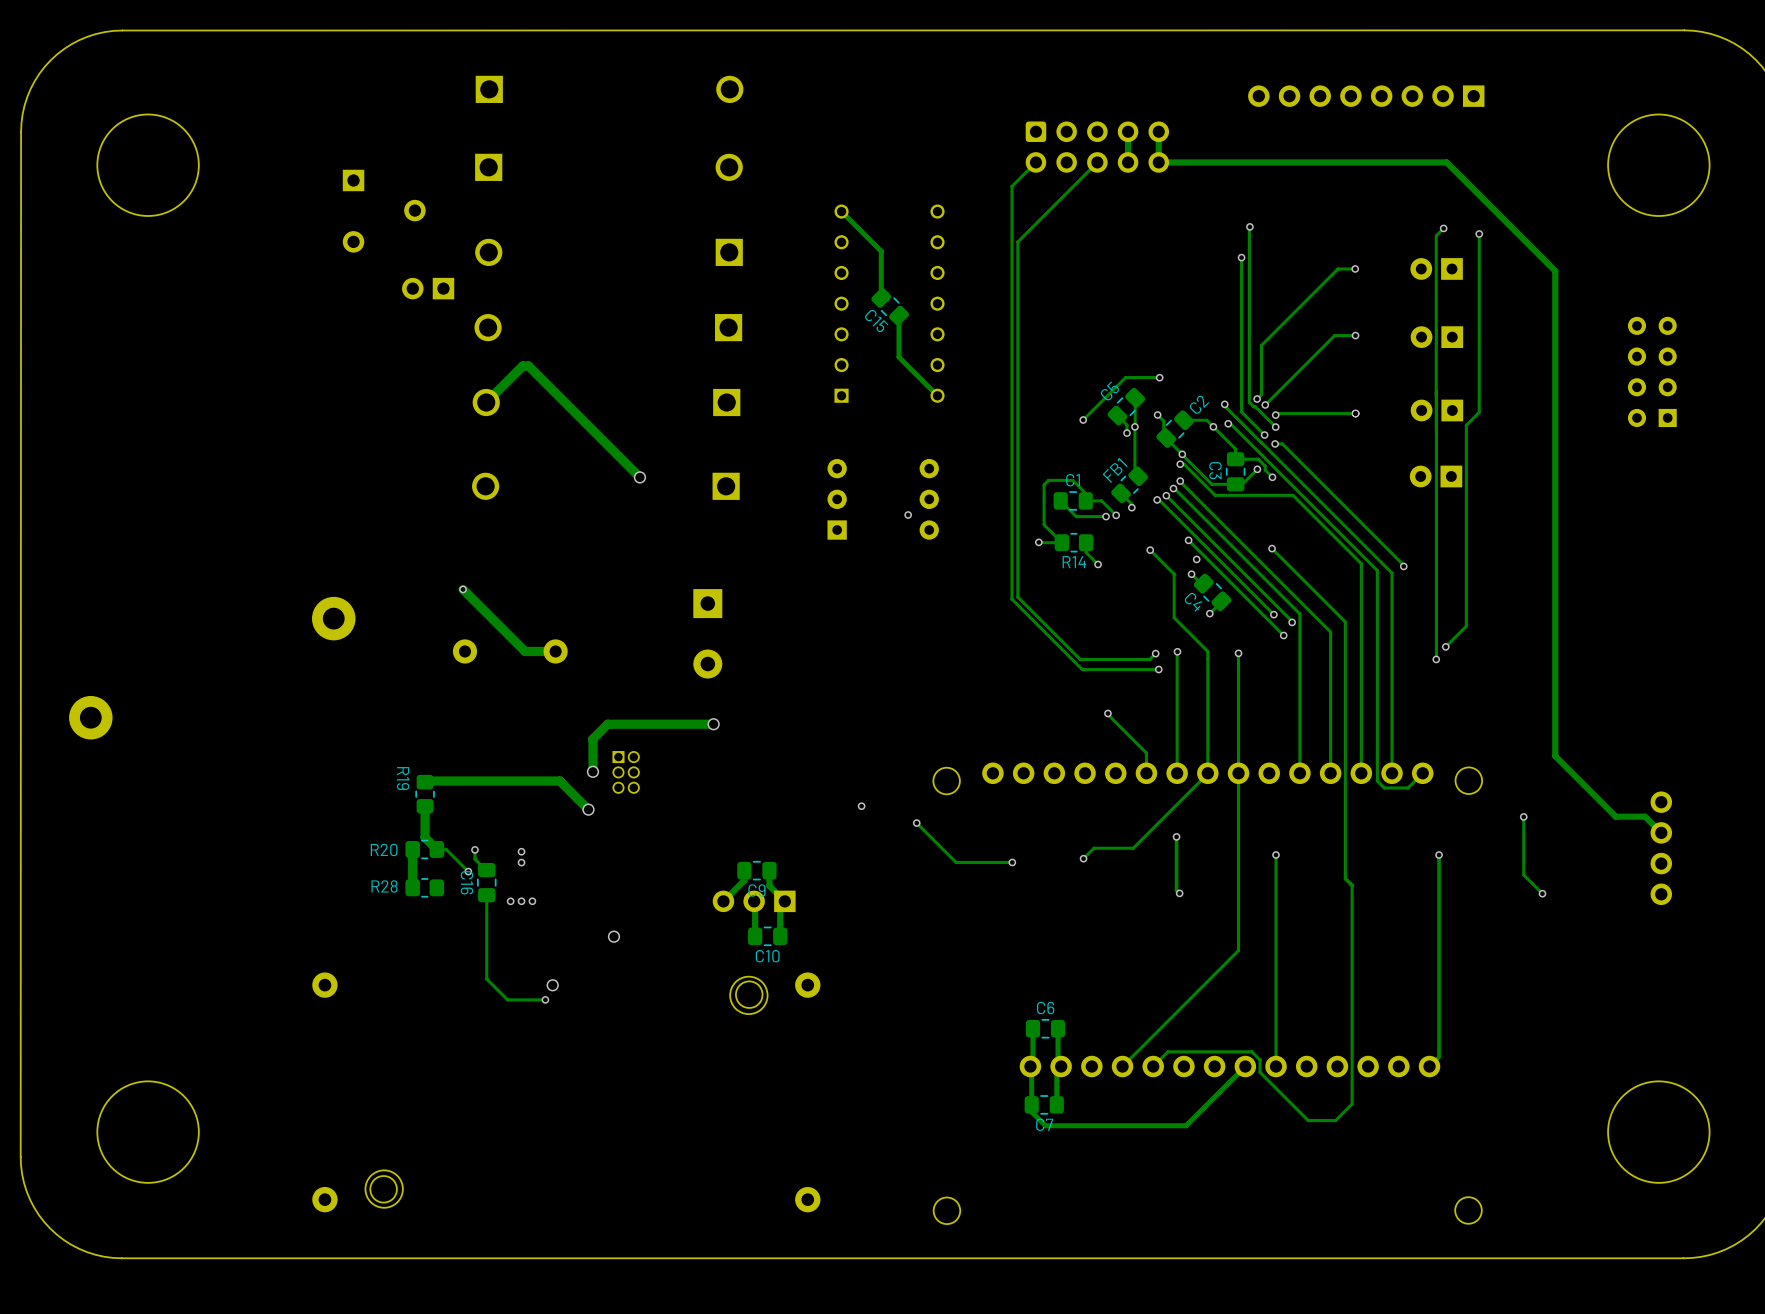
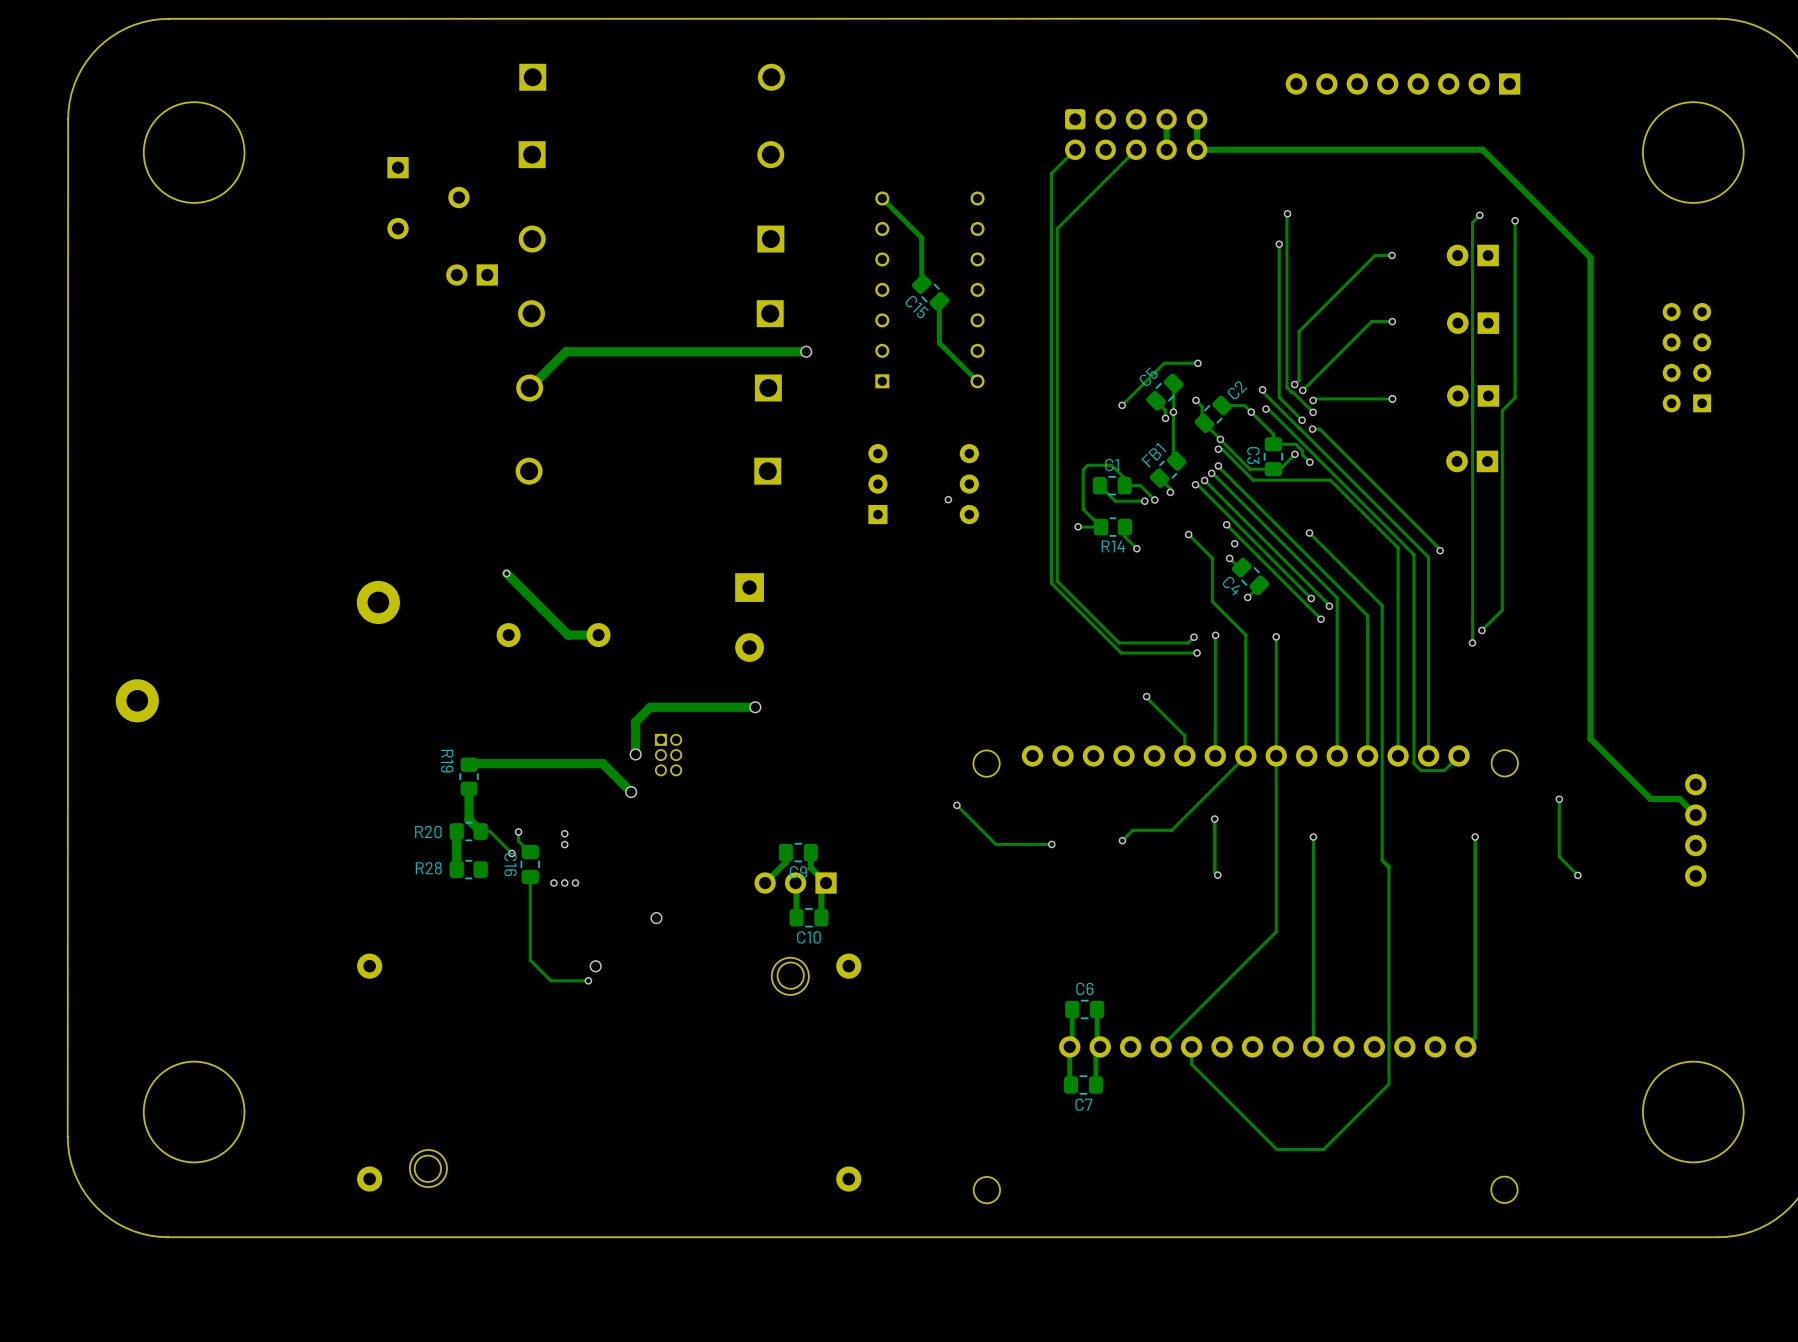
track: (528, 365) (639, 477) -> (571, 351) (806, 351)
via: none -> (806, 351)
via: (639, 477) -> none
via: (861, 806) -> none
track: (1153, 1066) (1167, 1051) (1251, 1051) (1260, 1060) (1260, 1072) (1308, 1120) (1335, 1120) -> (1191, 1046) (1191, 1064) (1276, 1149) (1323, 1149) (1372, 1100)
track: (1245, 1066) (1186, 1125) (1045, 1125) (1031, 1111) (1030, 1066) -> (1071, 1085) (1069, 1046)

